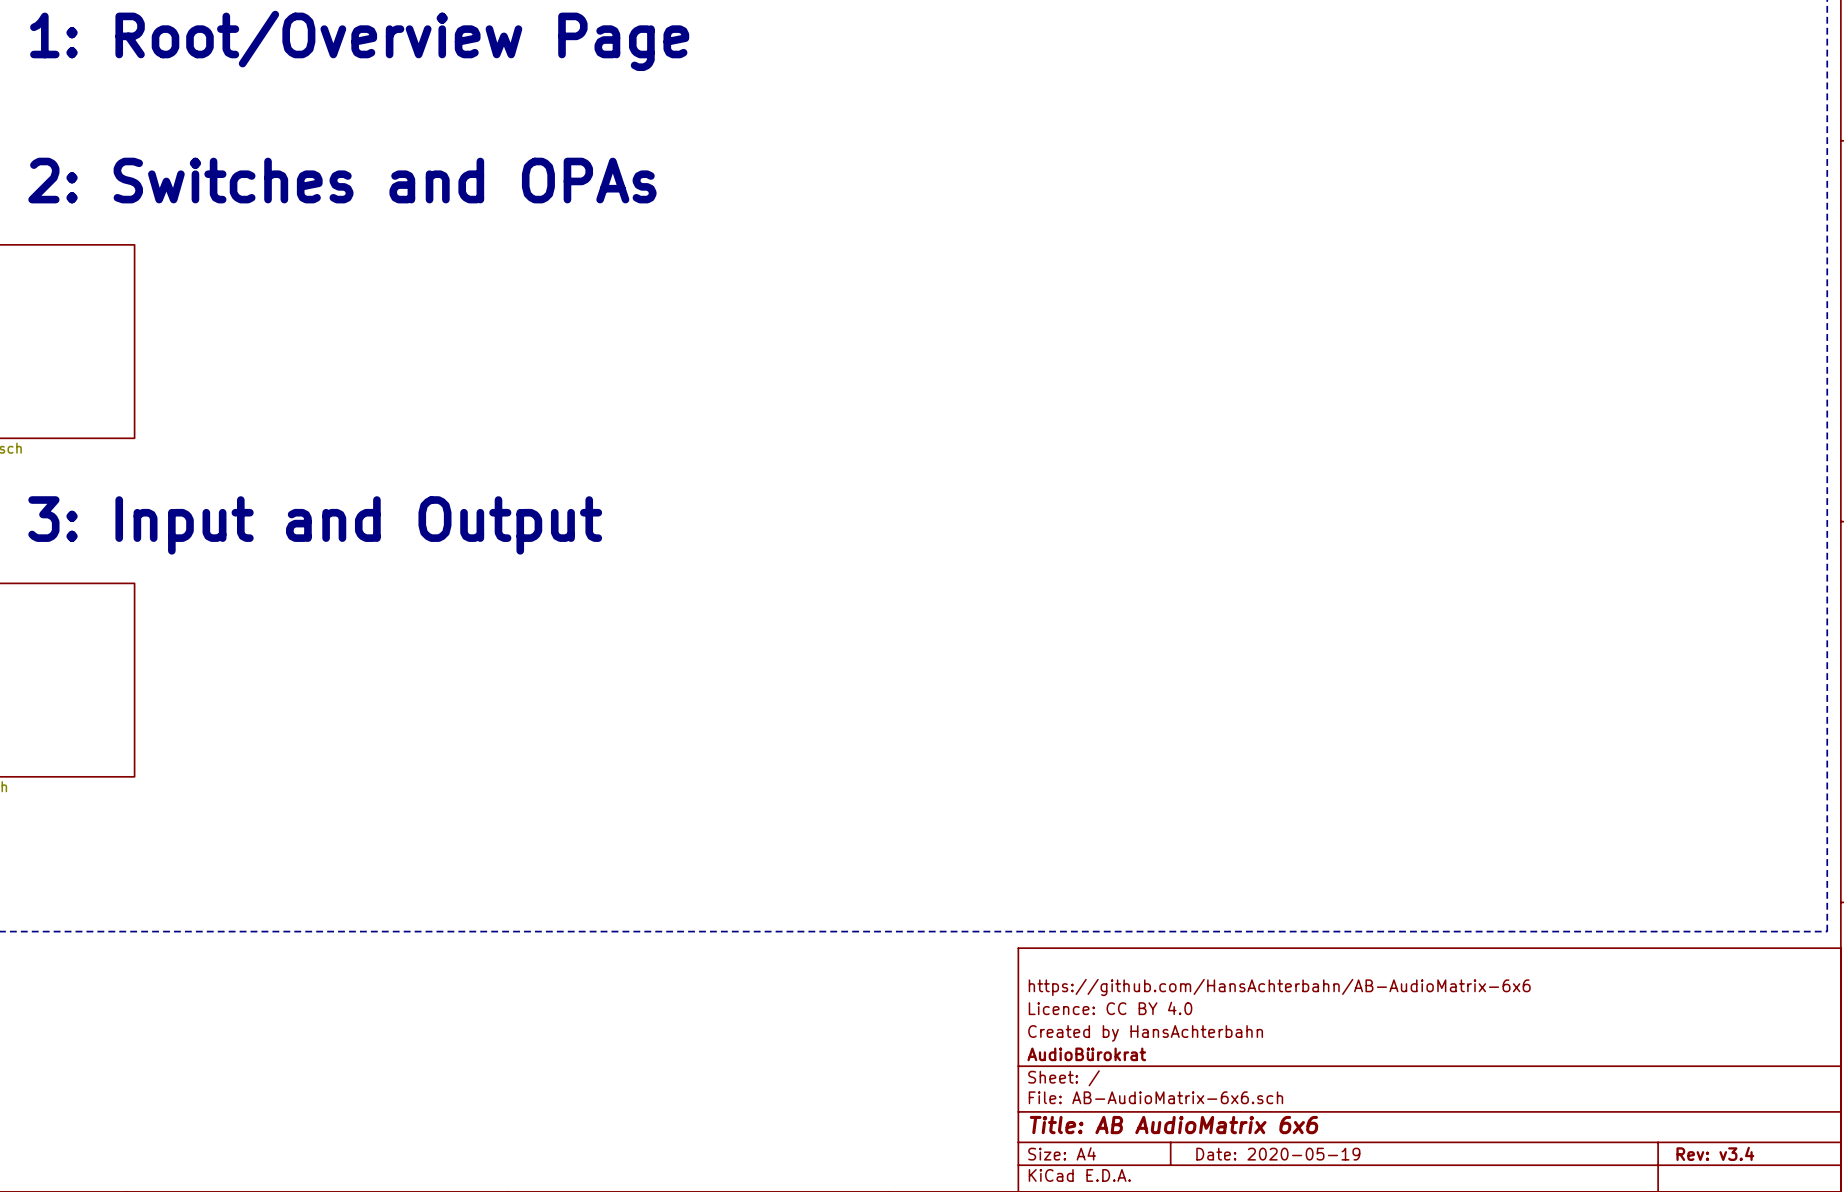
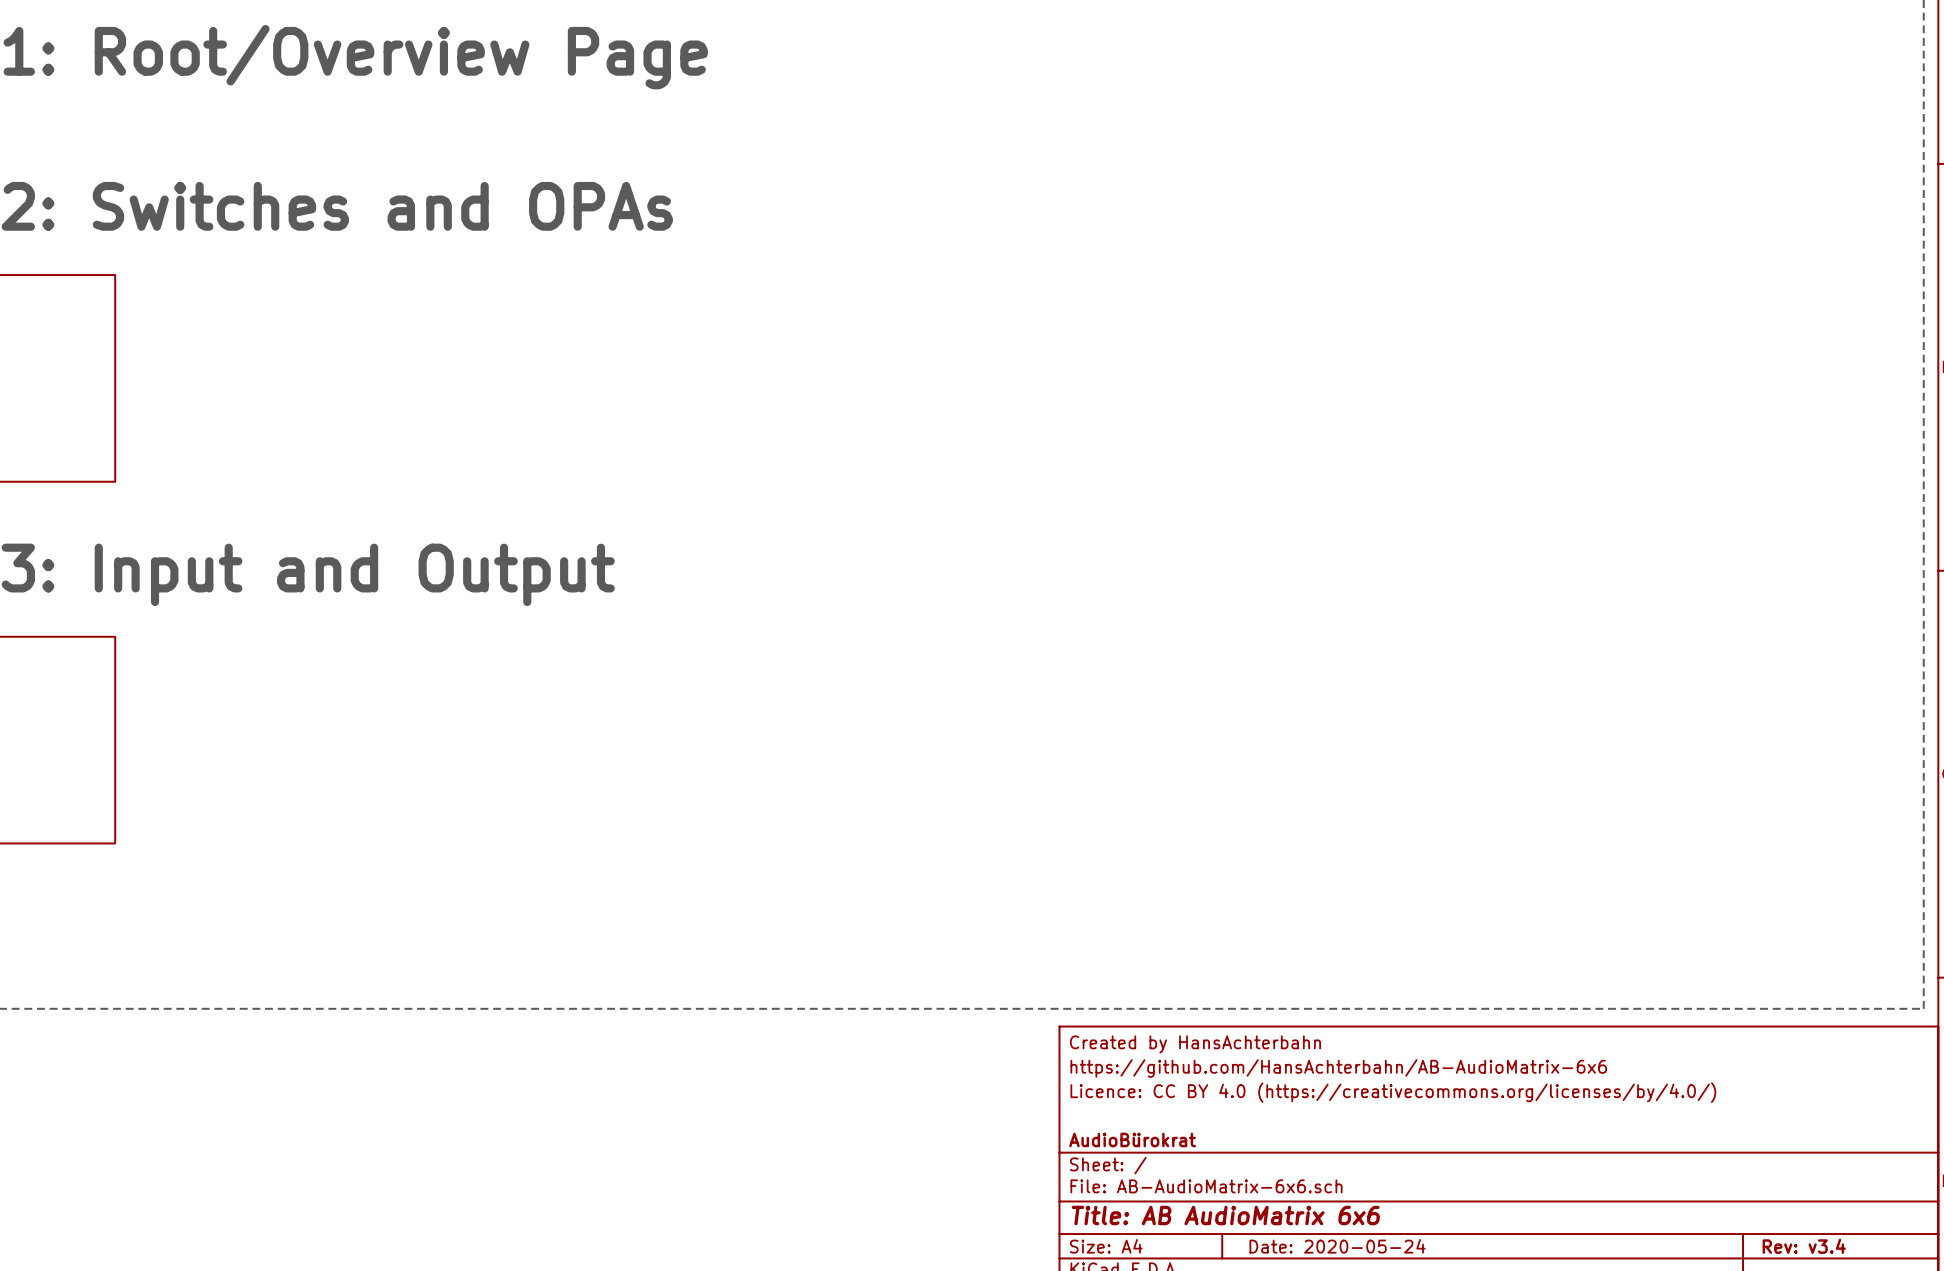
title block: Licence: CC BY 4.0 (1110, 1008) -> Licence: CC BY 4.0 (https://creativecommons.org/licenses/by/4.0/) (1393, 1092)
title block position: Created by HansAchterbahn (1145, 1033) -> Created by HansAchterbahn (1195, 1044)
title block: Date: 2020-05-19 (1278, 1154) -> Date: 2020-05-24 (1337, 1246)

